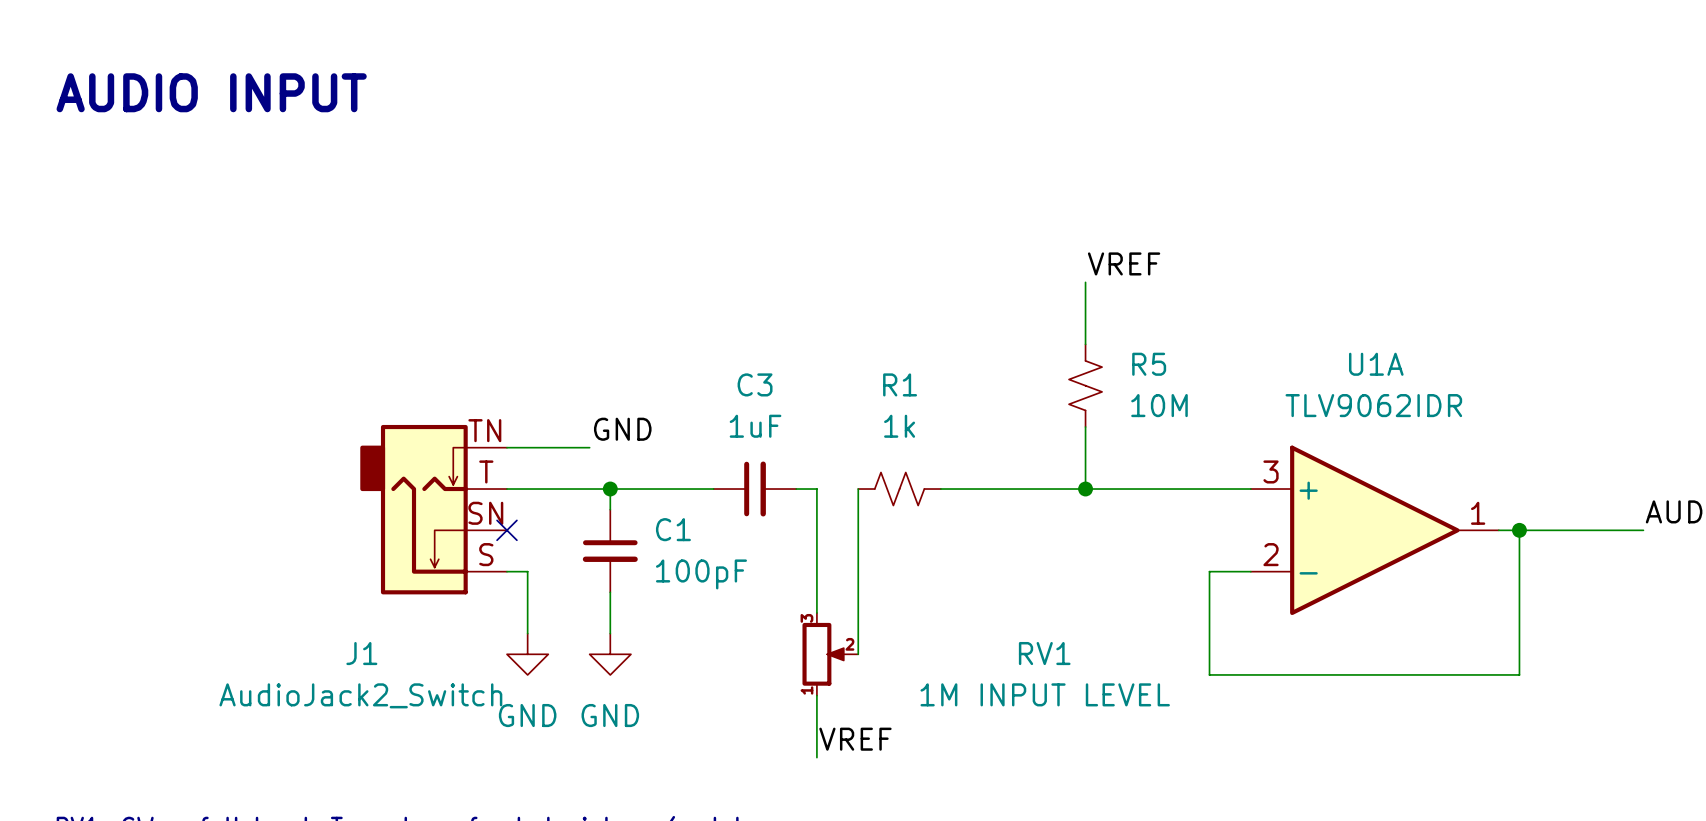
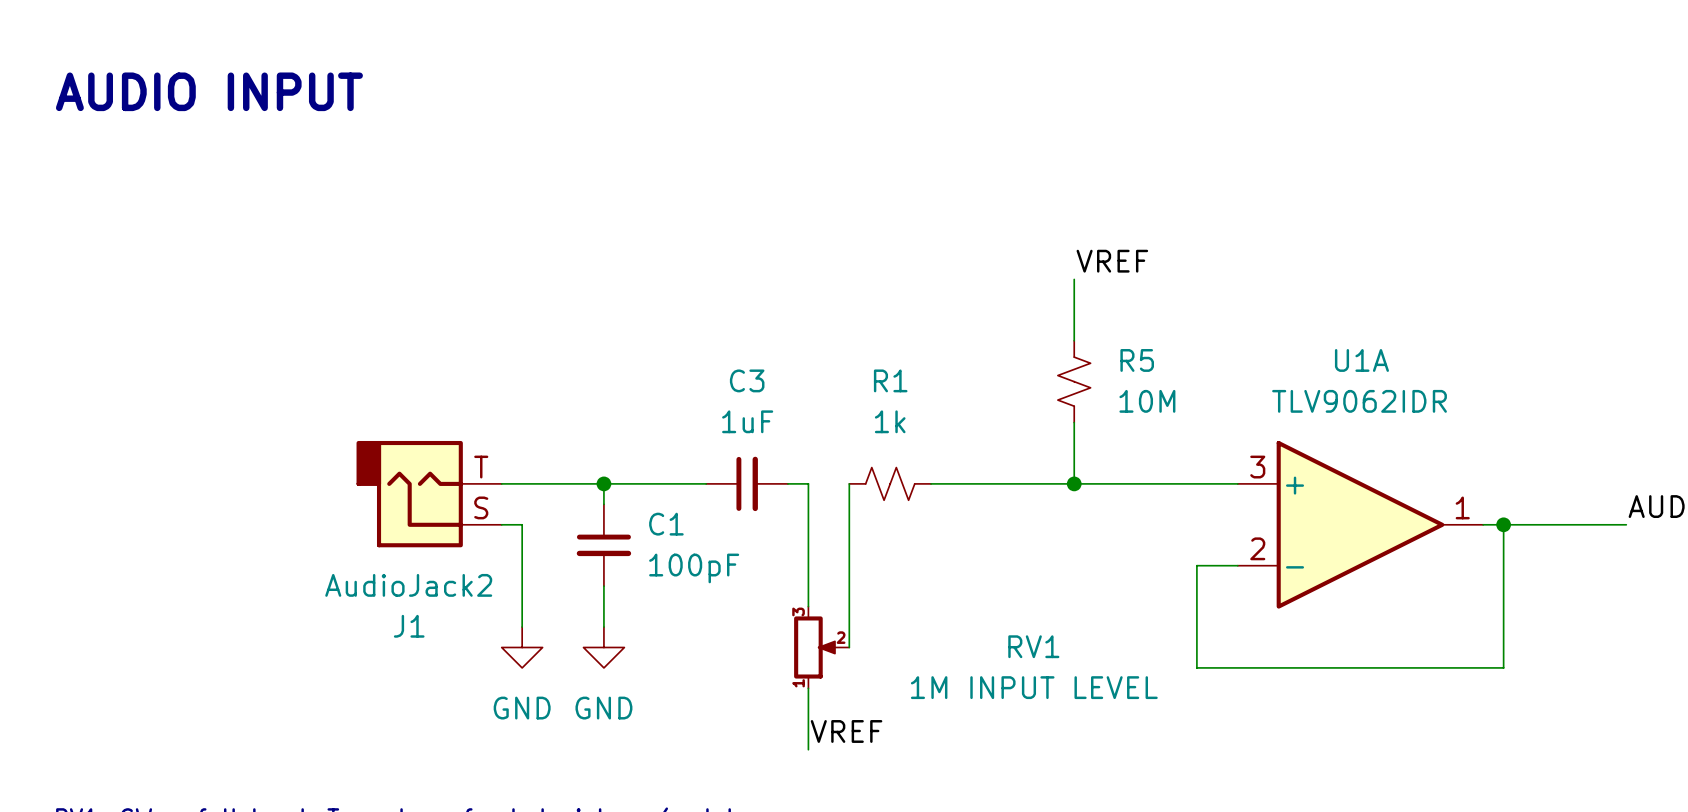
J1 symbol: [360, 424, 507, 595] -> [356, 440, 502, 548]
label: GND (622, 429) -> none
wire: (506, 447) (589, 447) -> none
no-connect mark: (506, 530) -> none
wire: (506, 571) (527, 571) -> (501, 524) (522, 524) (522, 565)
J1 name position: J1 (361, 653) -> J1 (409, 626)
J1 value: AudioJack2_Switch (360, 695) -> AudioJack2 (408, 585)

